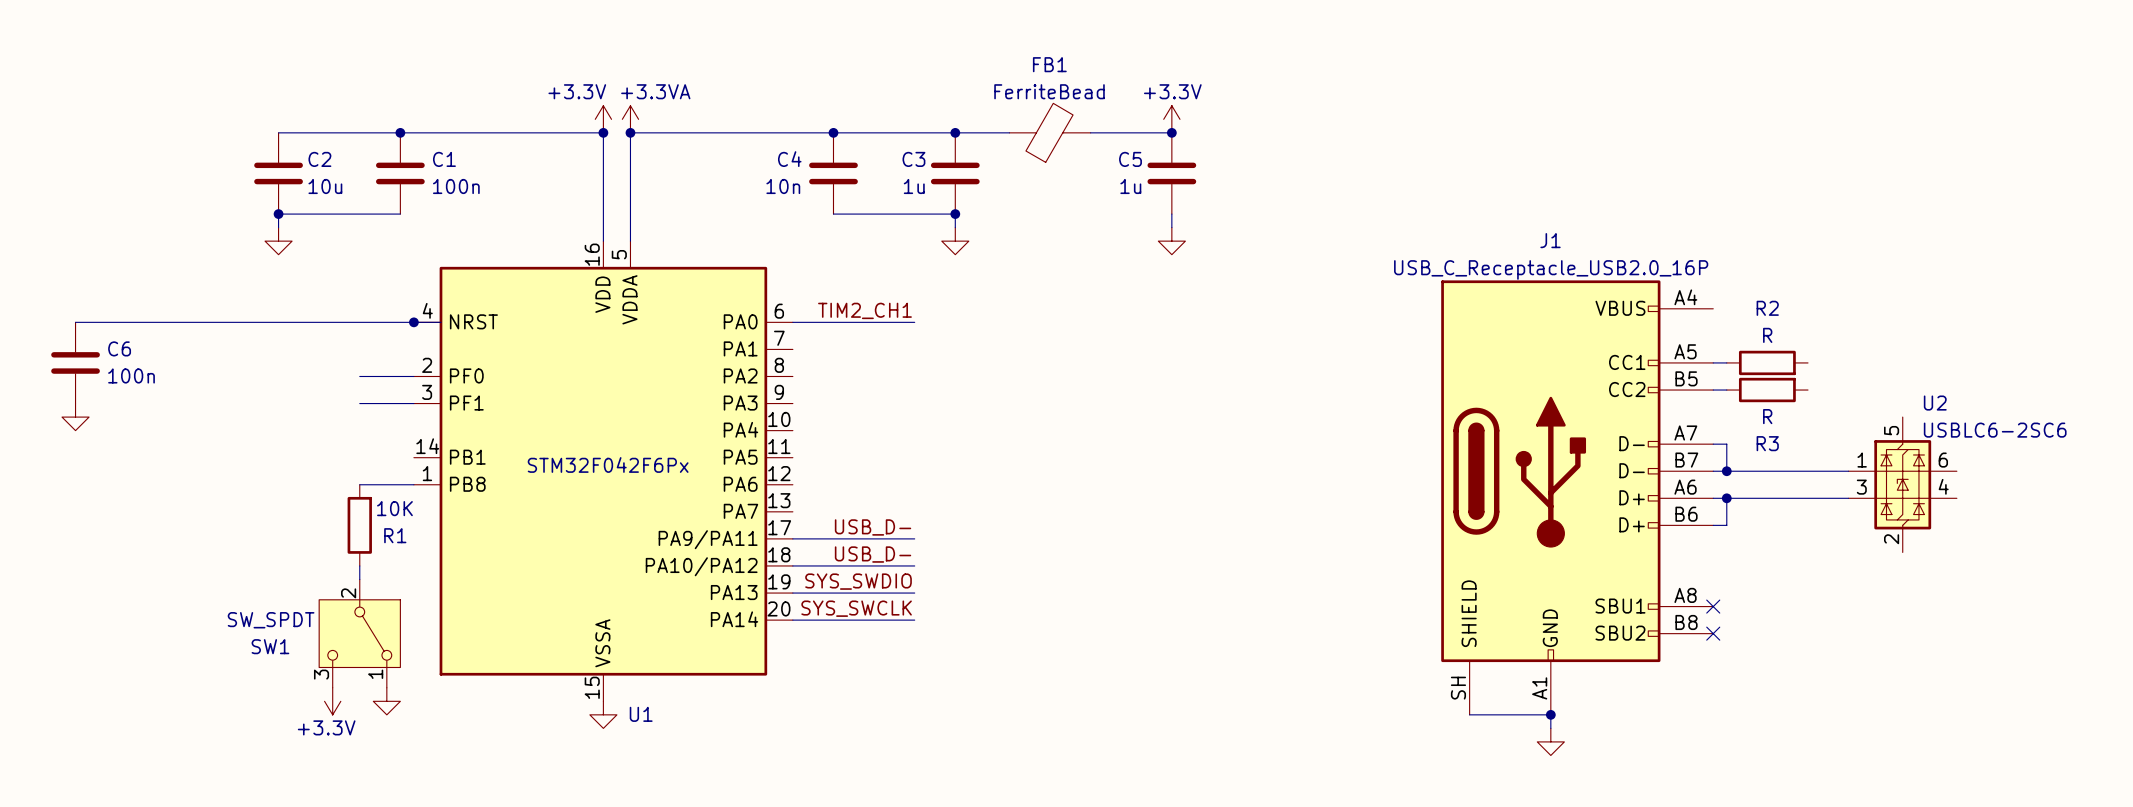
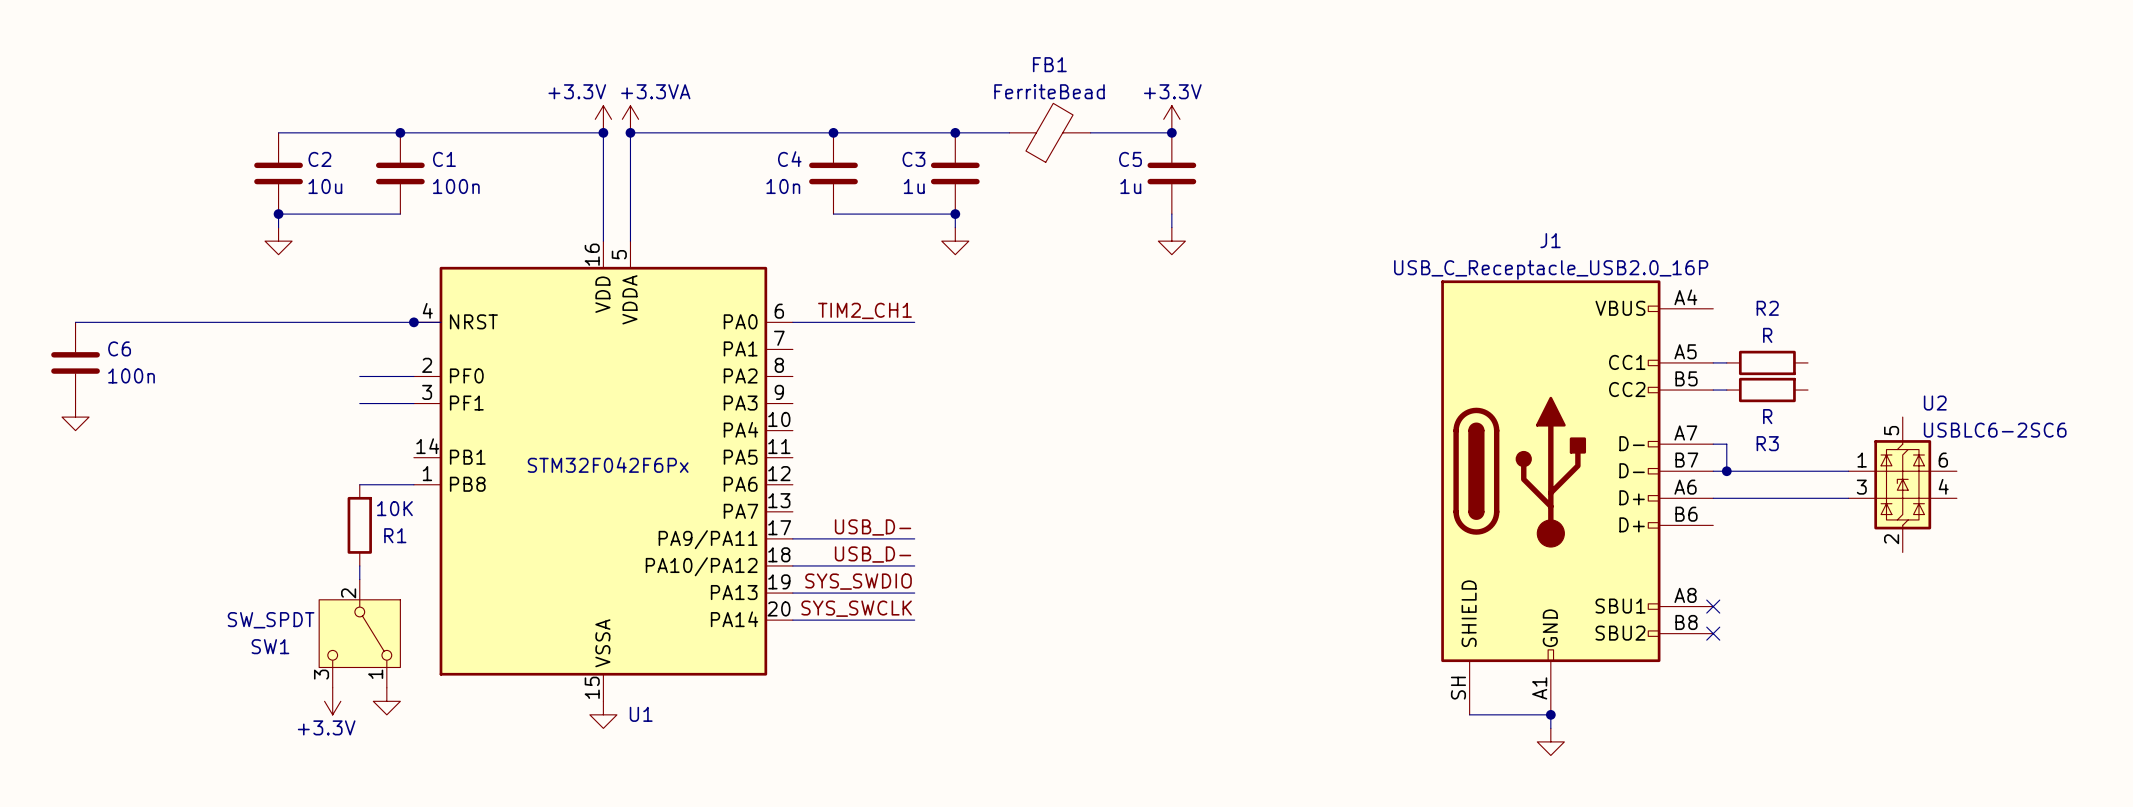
wire: (1726, 498) (1726, 525) (1713, 525) -> none
junction: (1726, 498) -> none

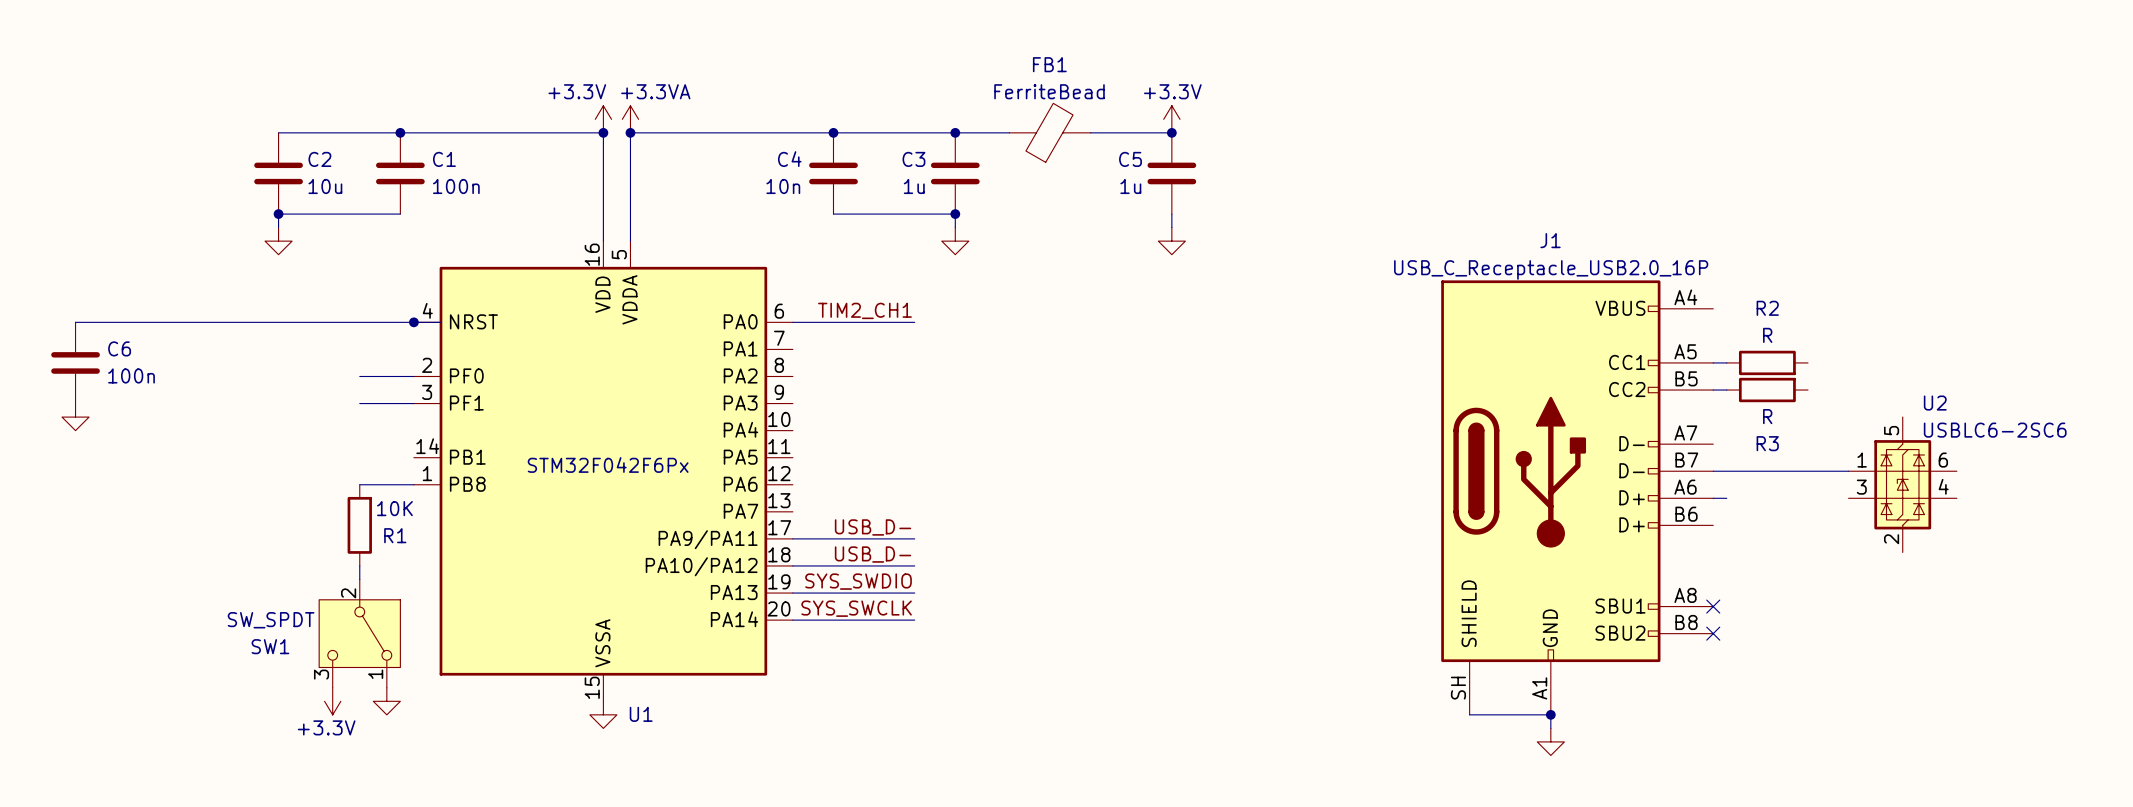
wire: (1713, 444) (1726, 444) (1726, 471) -> none
junction: (1726, 471) -> none
wire: (1726, 498) (1848, 498) -> none

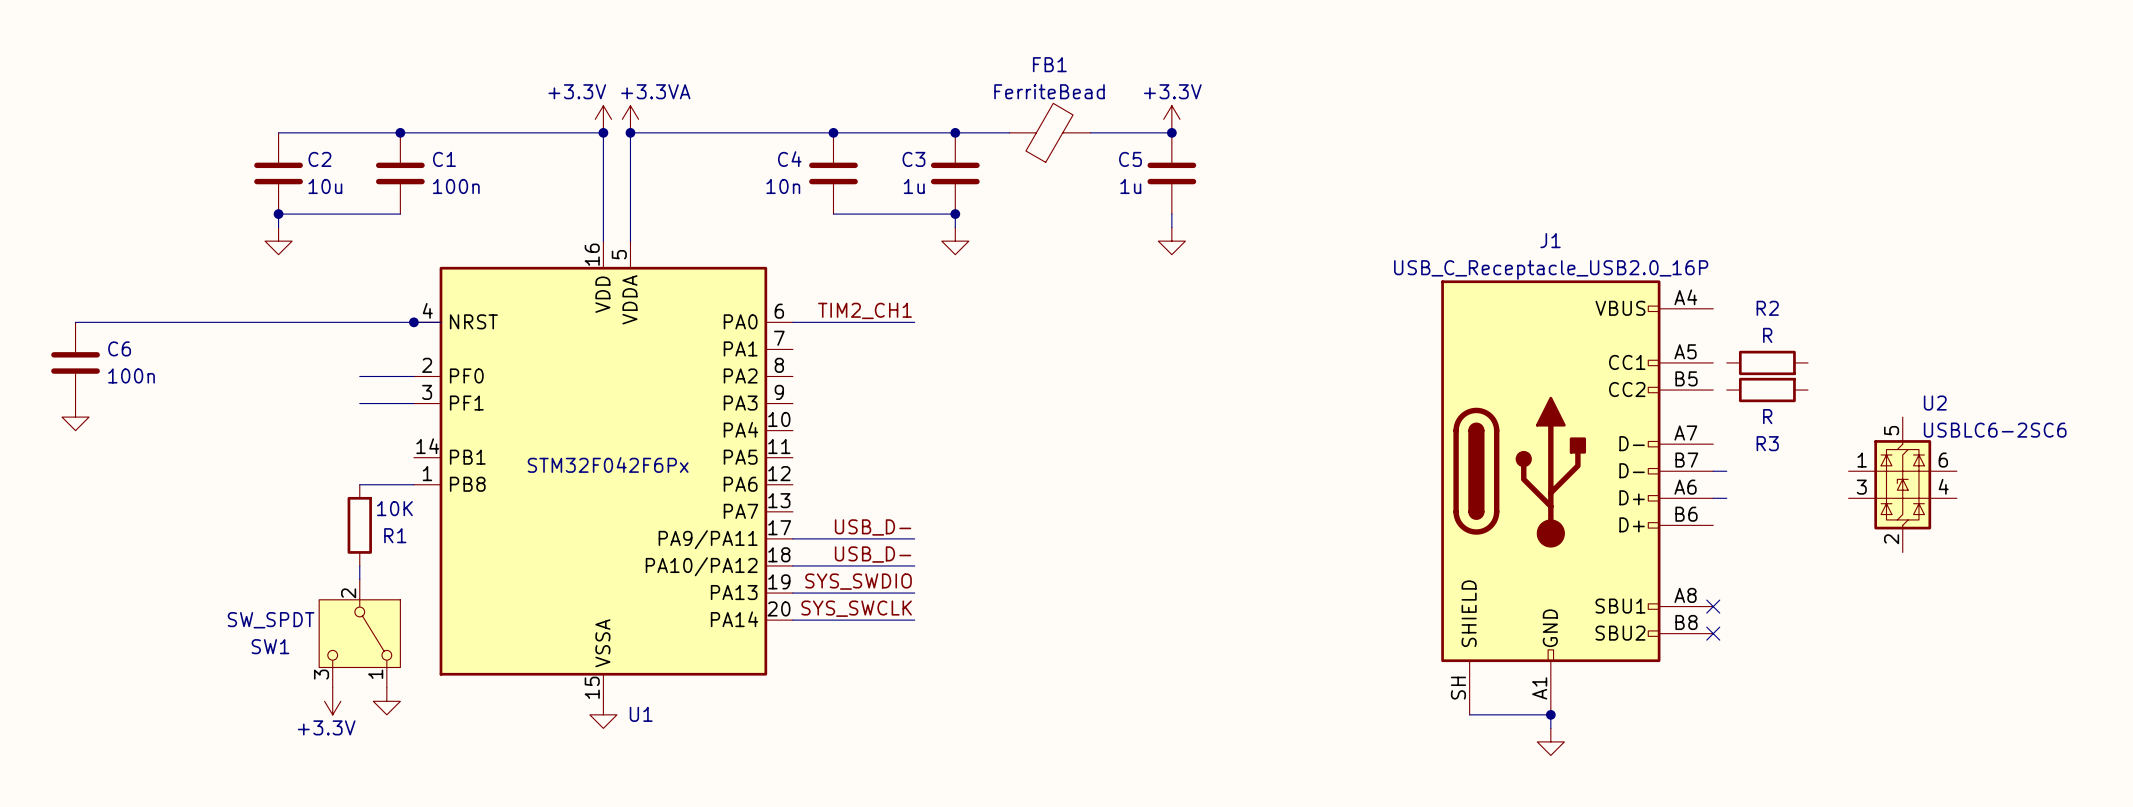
wire: (1713, 362) (1726, 362) -> none
wire: (1713, 390) (1726, 390) -> none
wire: (1726, 471) (1848, 471) -> none

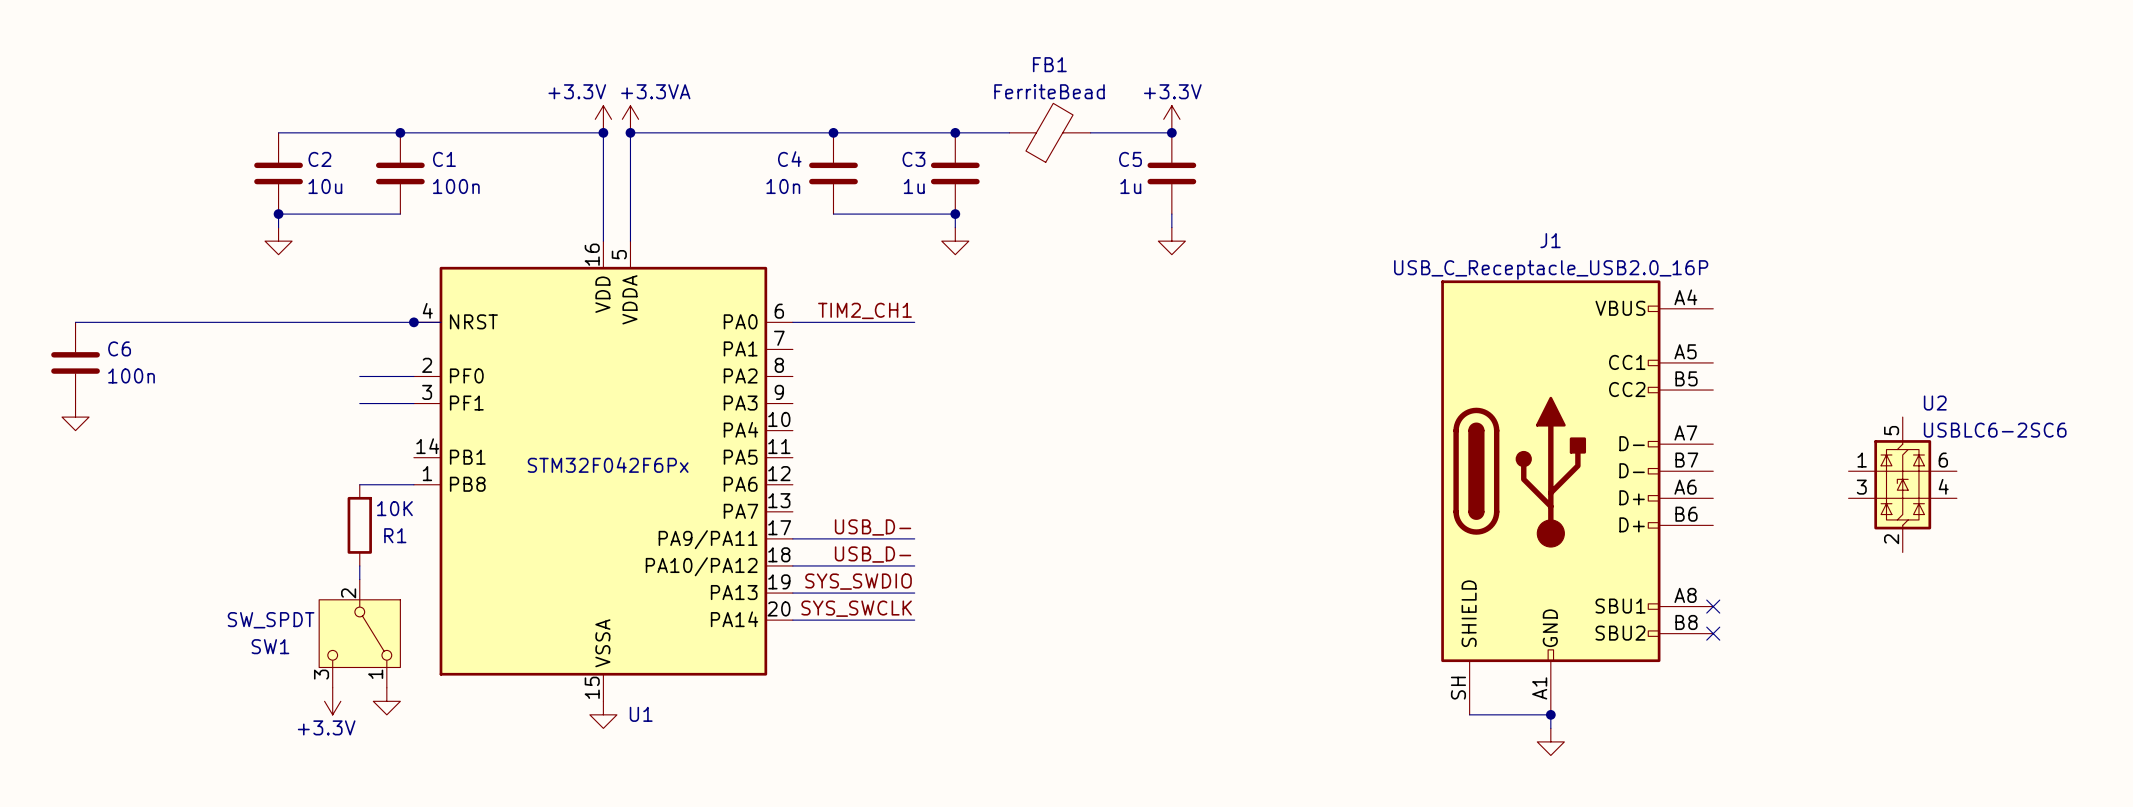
R2: R (1767, 362) -> none
R3: R (1767, 390) -> none
wire: (1713, 471) (1726, 471) -> none
wire: (1713, 498) (1726, 498) -> none

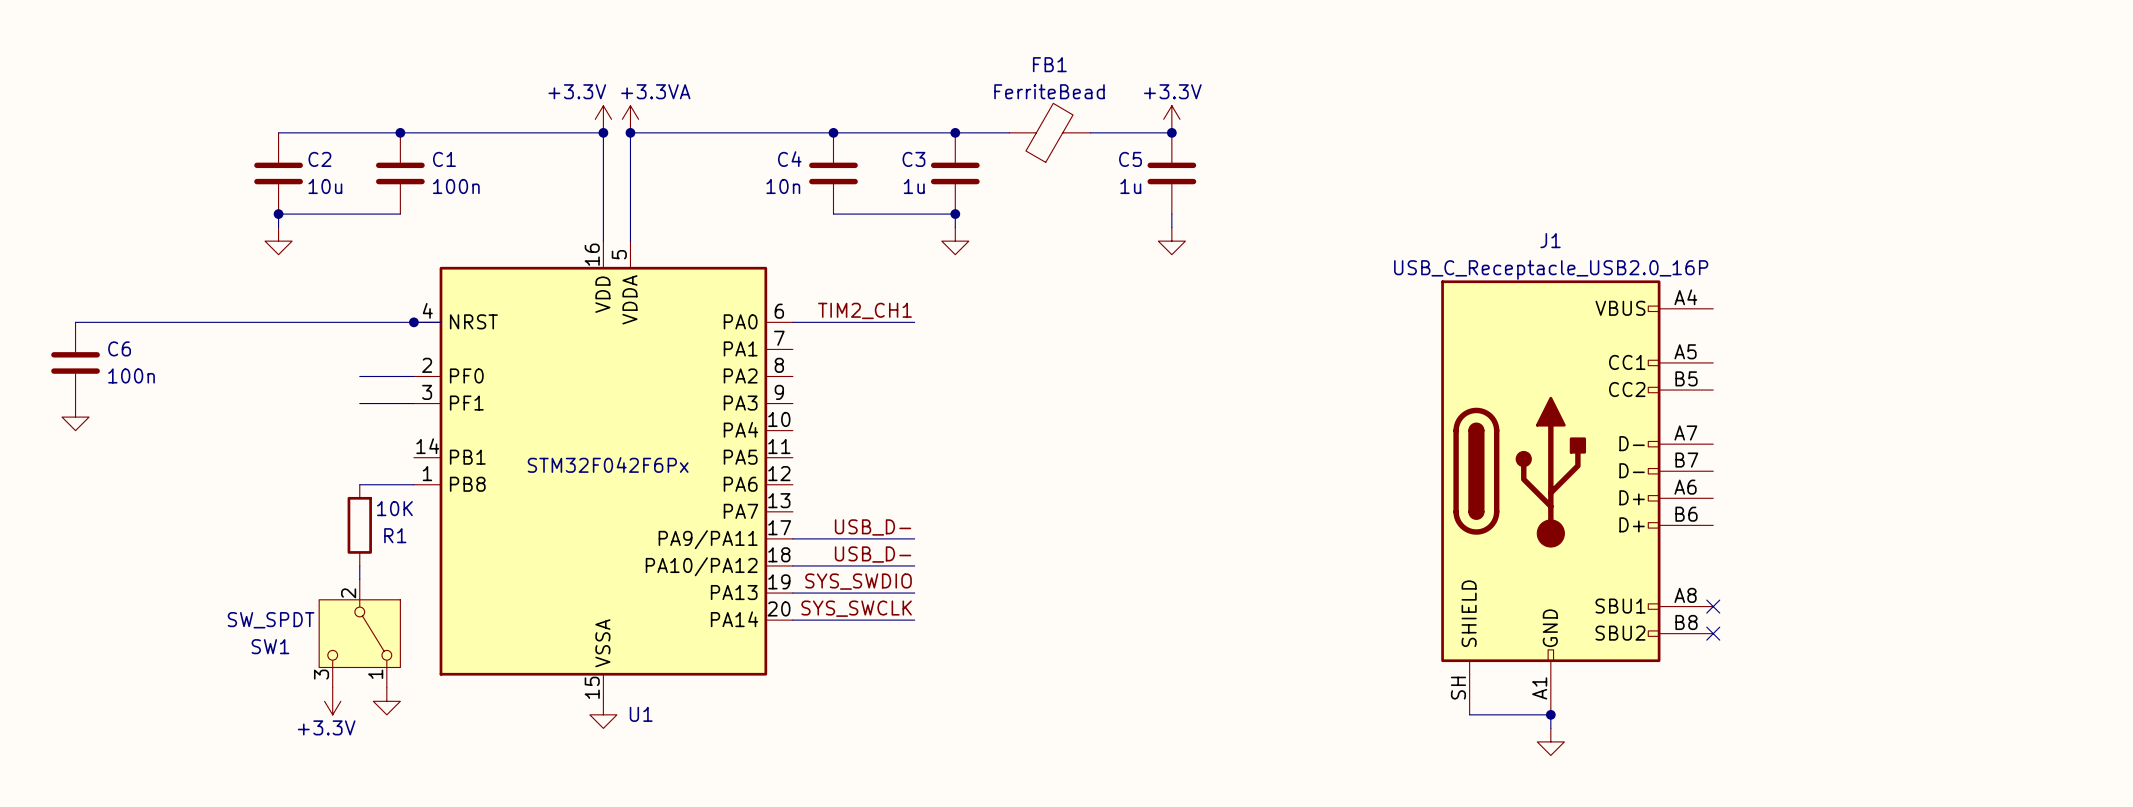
U2: USBLC6-2SC6 (1902, 484) -> none

